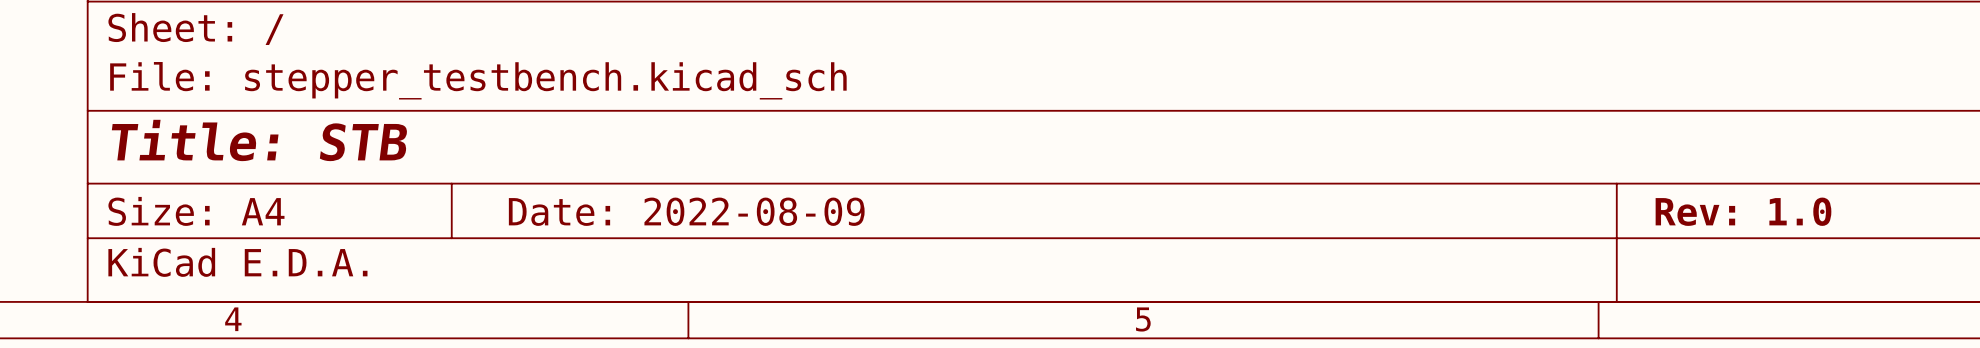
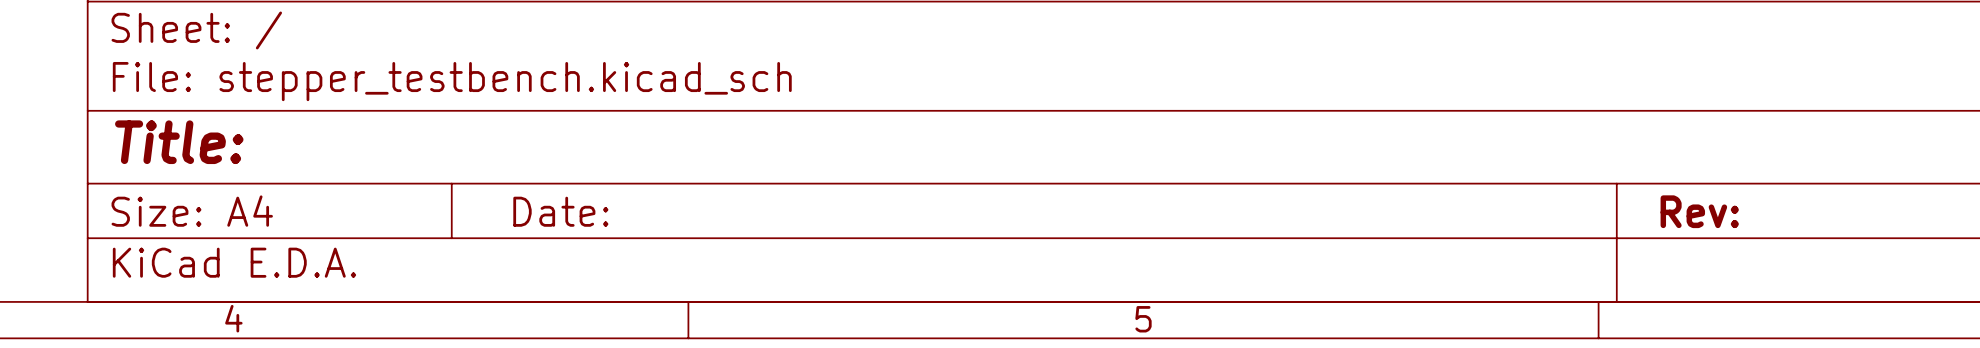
title block: Title: STB (259, 140) -> Title: (179, 142)
title block: Date: 2022-08-09 (686, 211) -> Date: (560, 211)
title block: Rev: 1.0 (1743, 211) -> Rev: (1699, 211)

